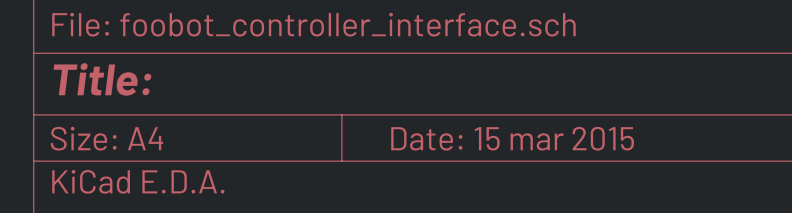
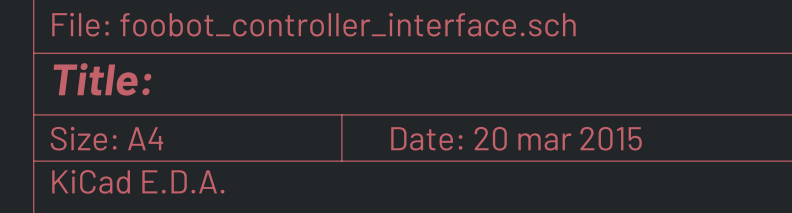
title block: Date: 15 mar 2015 (512, 138) -> Date: 20 mar 2015 (516, 138)

